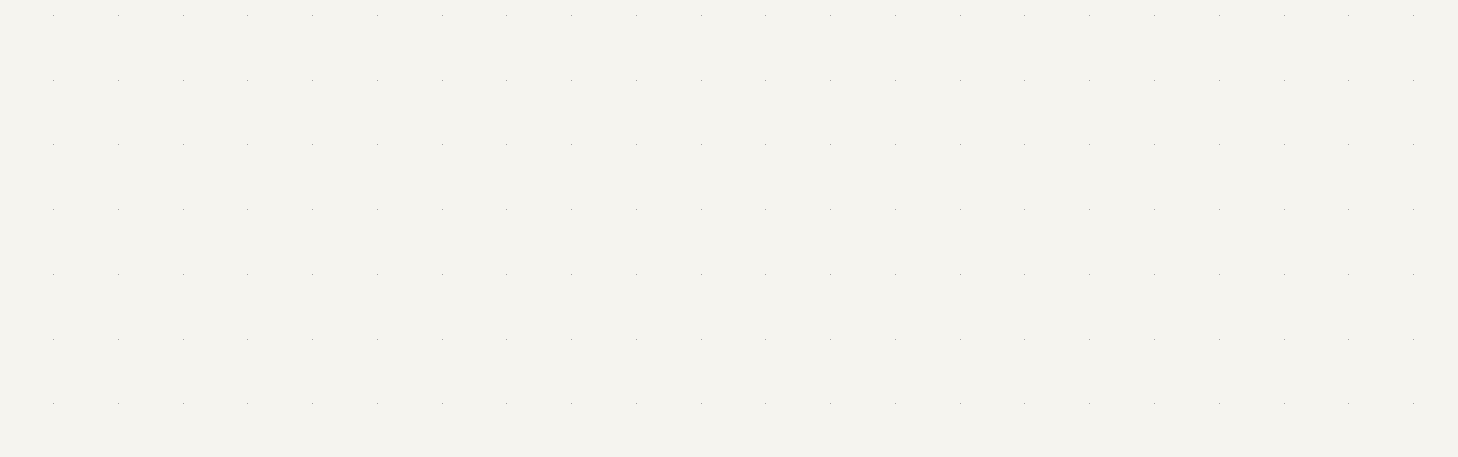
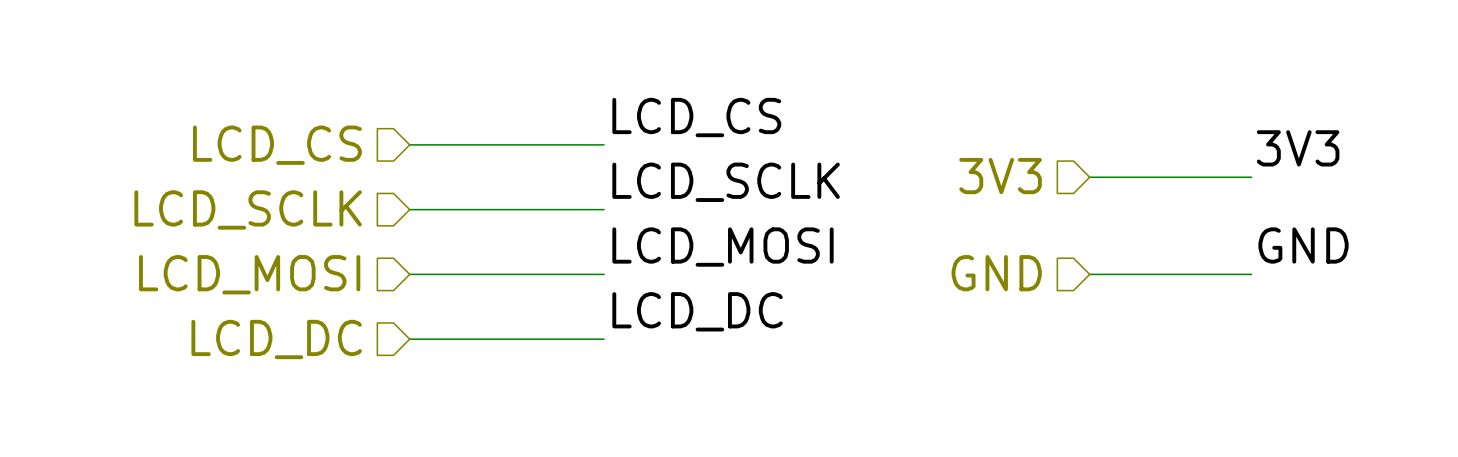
label: none -> LCD_CS (696, 117)
wire: none -> (409, 144) (604, 144)
hierarchical label: none -> LCD_CS (277, 145)
label: none -> 3V3 (1298, 148)
hierarchical label: none -> 3V3 (1000, 176)
wire: none -> (1089, 177) (1251, 177)
label: none -> LCD_SCLK (726, 182)
wire: none -> (409, 209) (604, 209)
hierarchical label: none -> LCD_SCLK (248, 209)
label: none -> GND (1303, 245)
label: none -> LCD_MOSI (722, 247)
hierarchical label: none -> GND (996, 273)
wire: none -> (409, 274) (604, 274)
wire: none -> (1089, 274) (1251, 274)
hierarchical label: none -> LCD_MOSI (249, 274)
label: none -> LCD_DC (697, 311)
wire: none -> (409, 339) (604, 339)
hierarchical label: none -> LCD_DC (276, 339)

